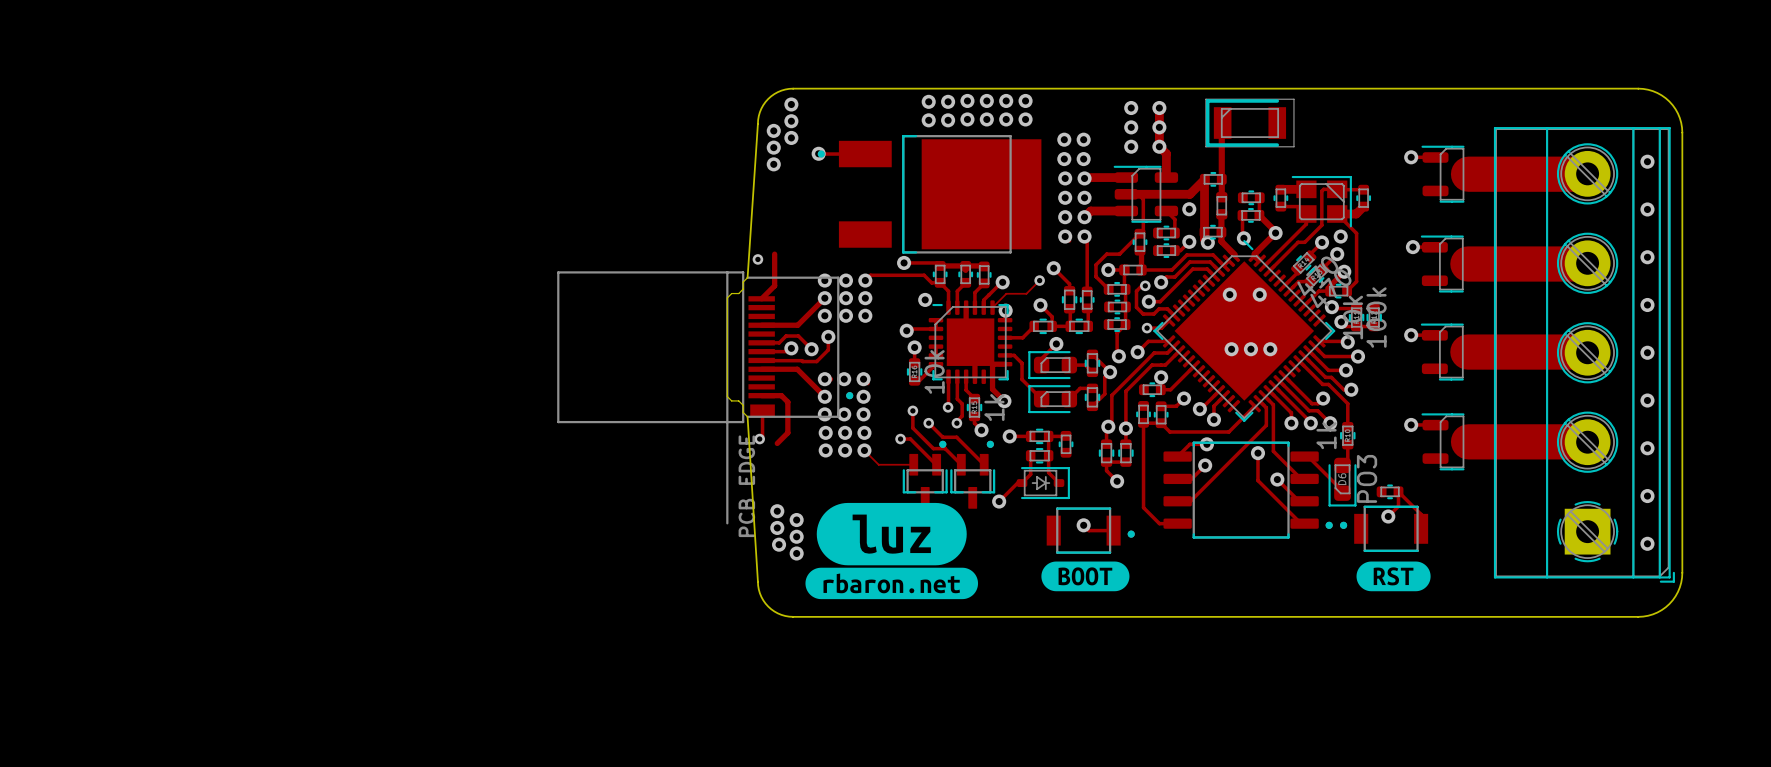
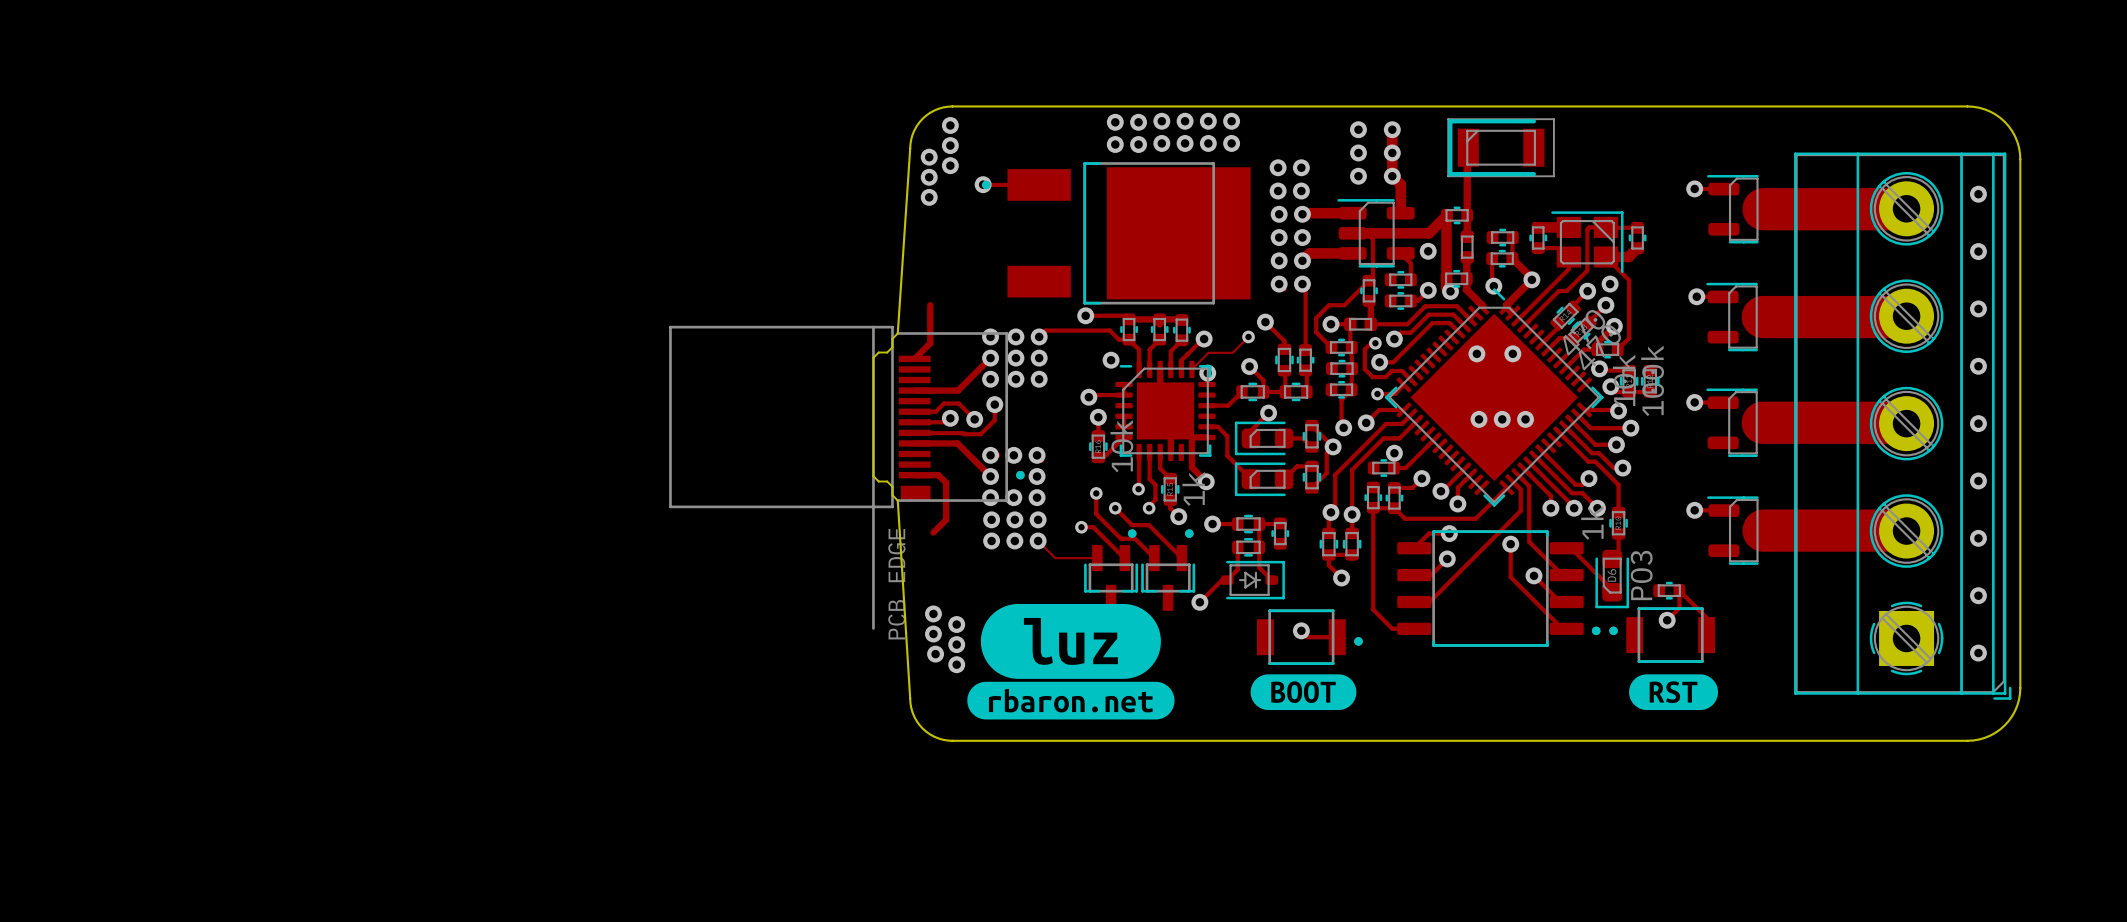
via: (757, 259) -> none
track: (762, 410) (762, 436) (759, 439) -> none
via: (759, 439) -> none

